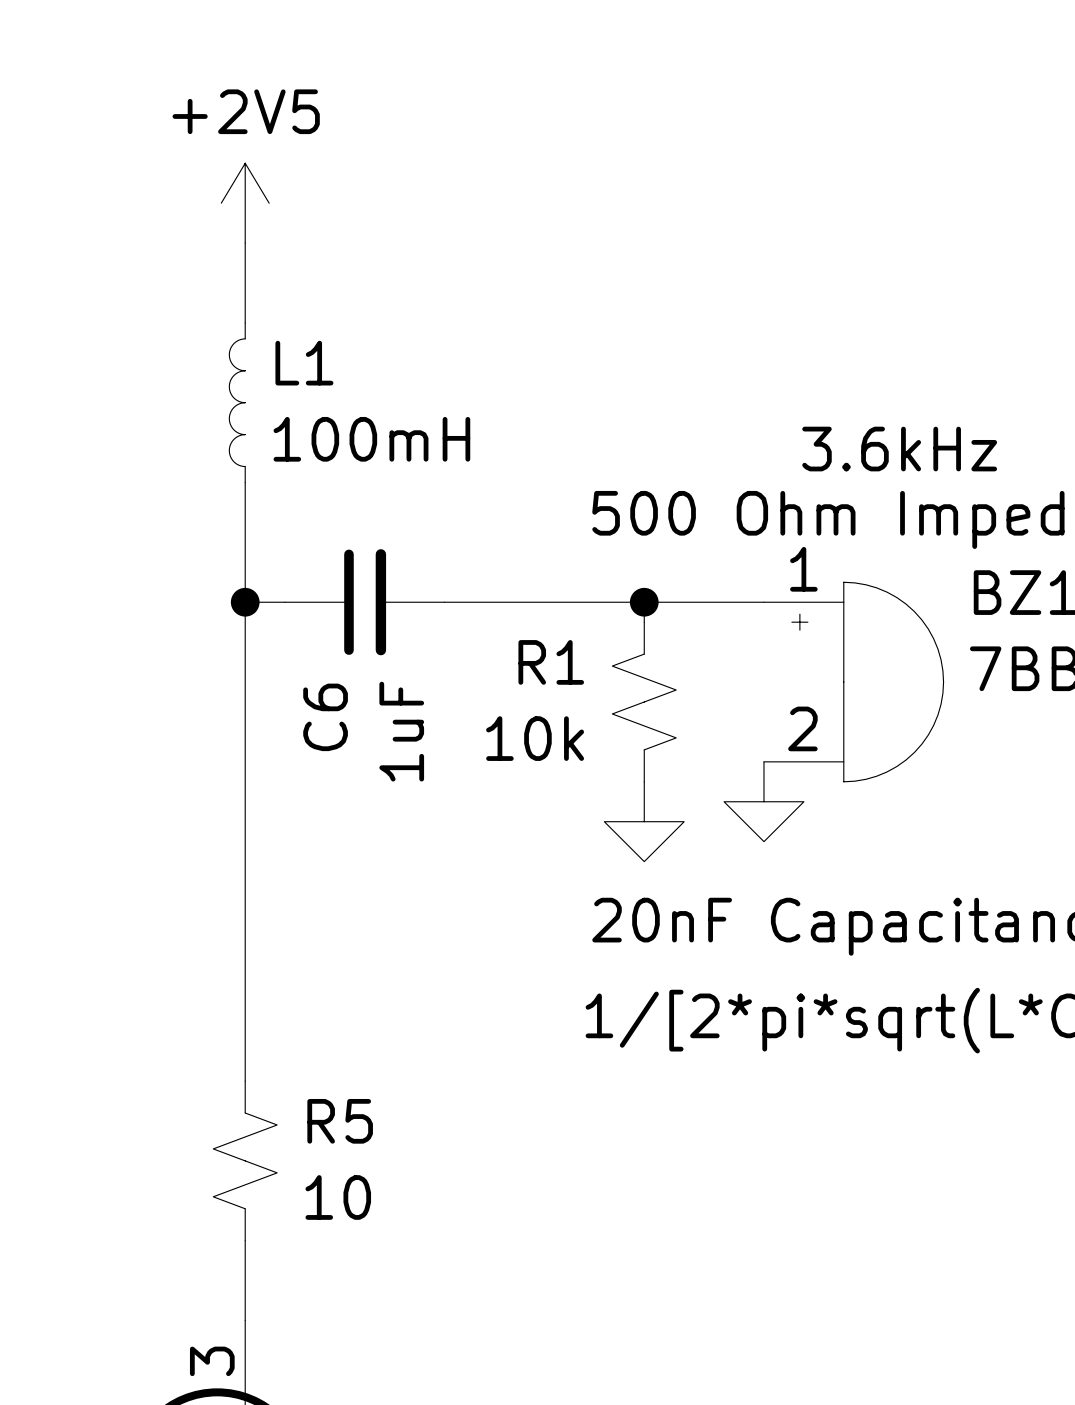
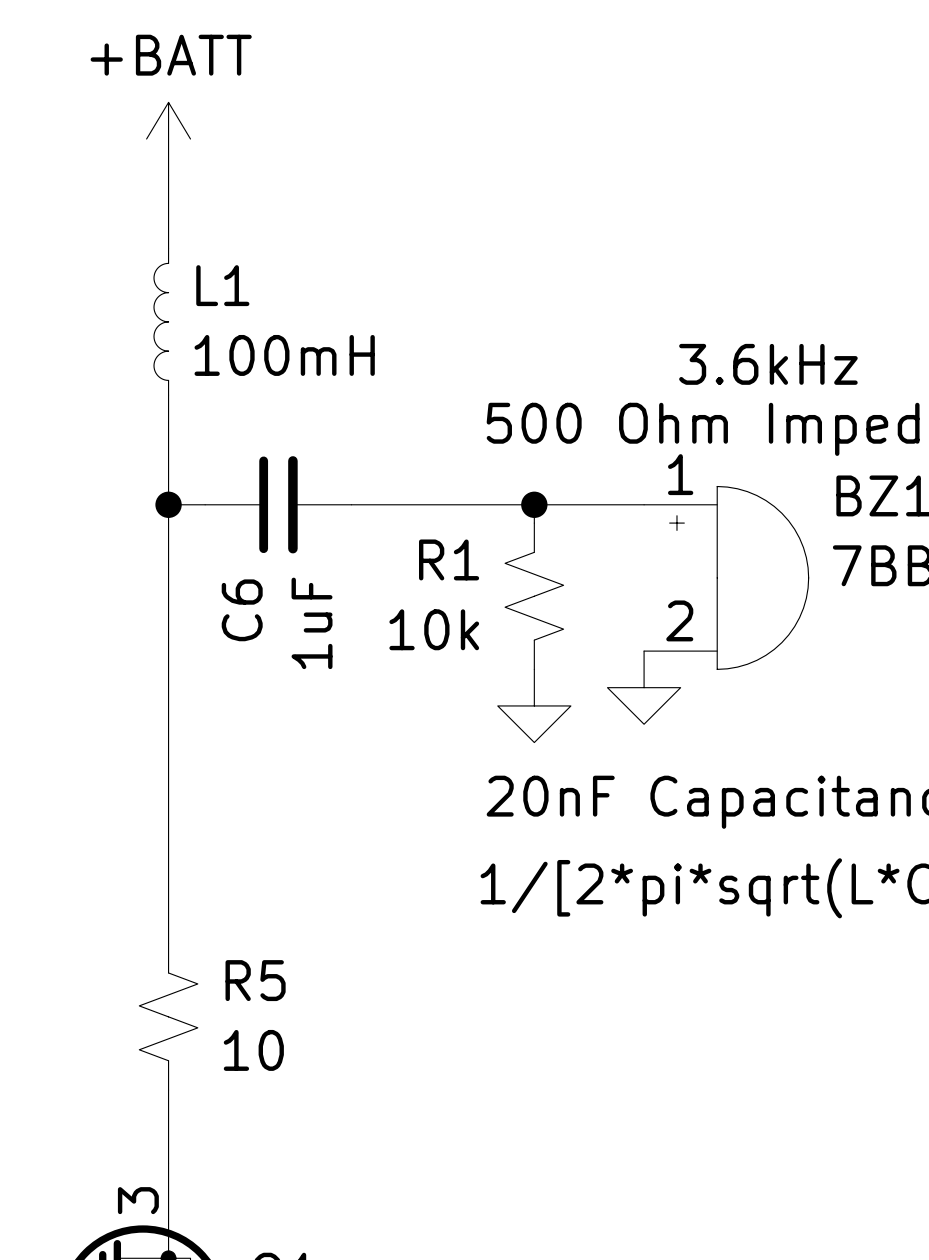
power symbol: +2V5 (245, 203) -> +BATT (168, 139)

